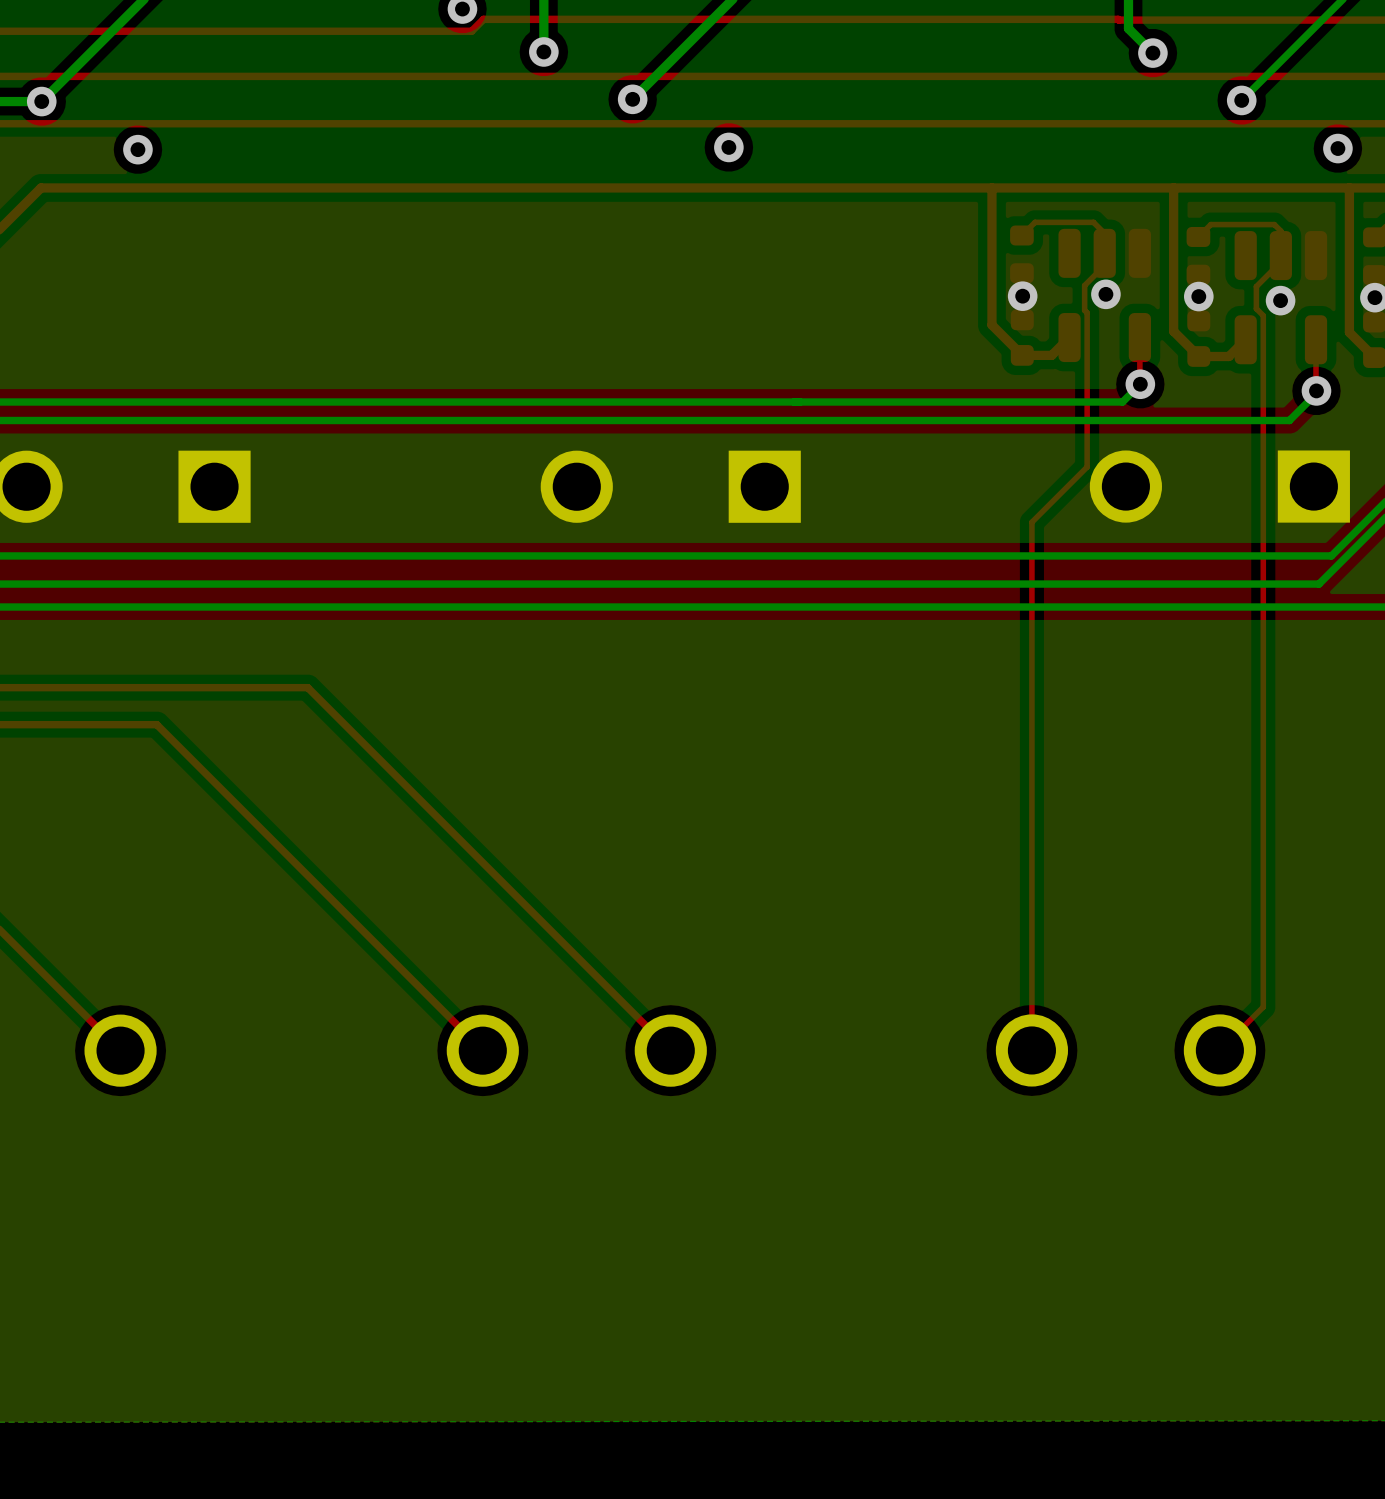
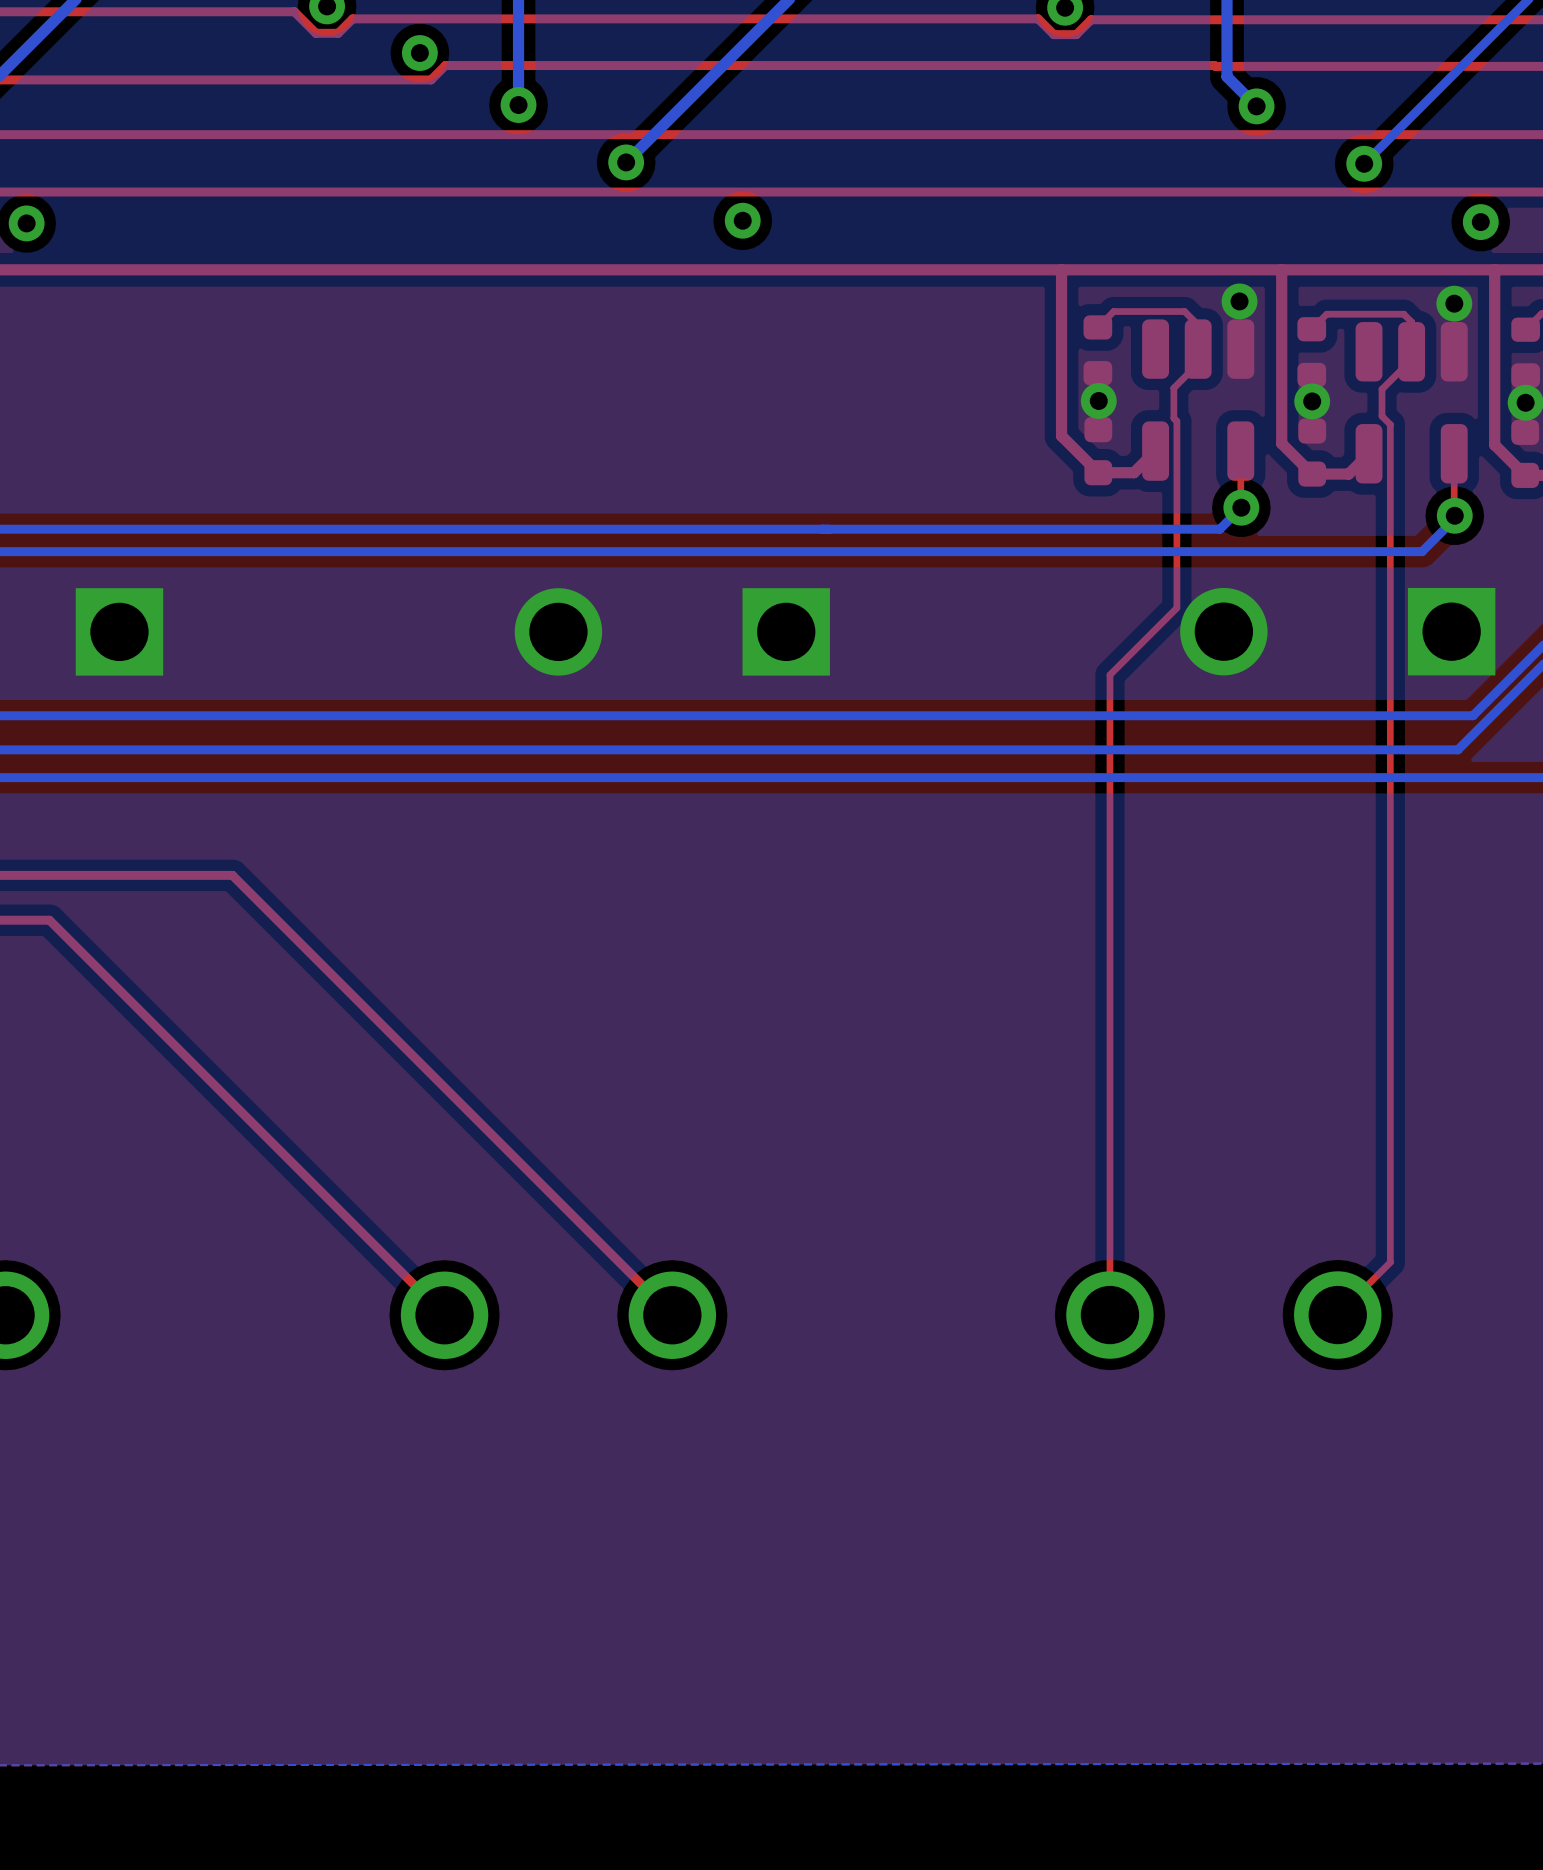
via: none -> (1239, 301)
via: none -> (1454, 303)
via: (1105, 294) -> none
via: (1280, 300) -> none

